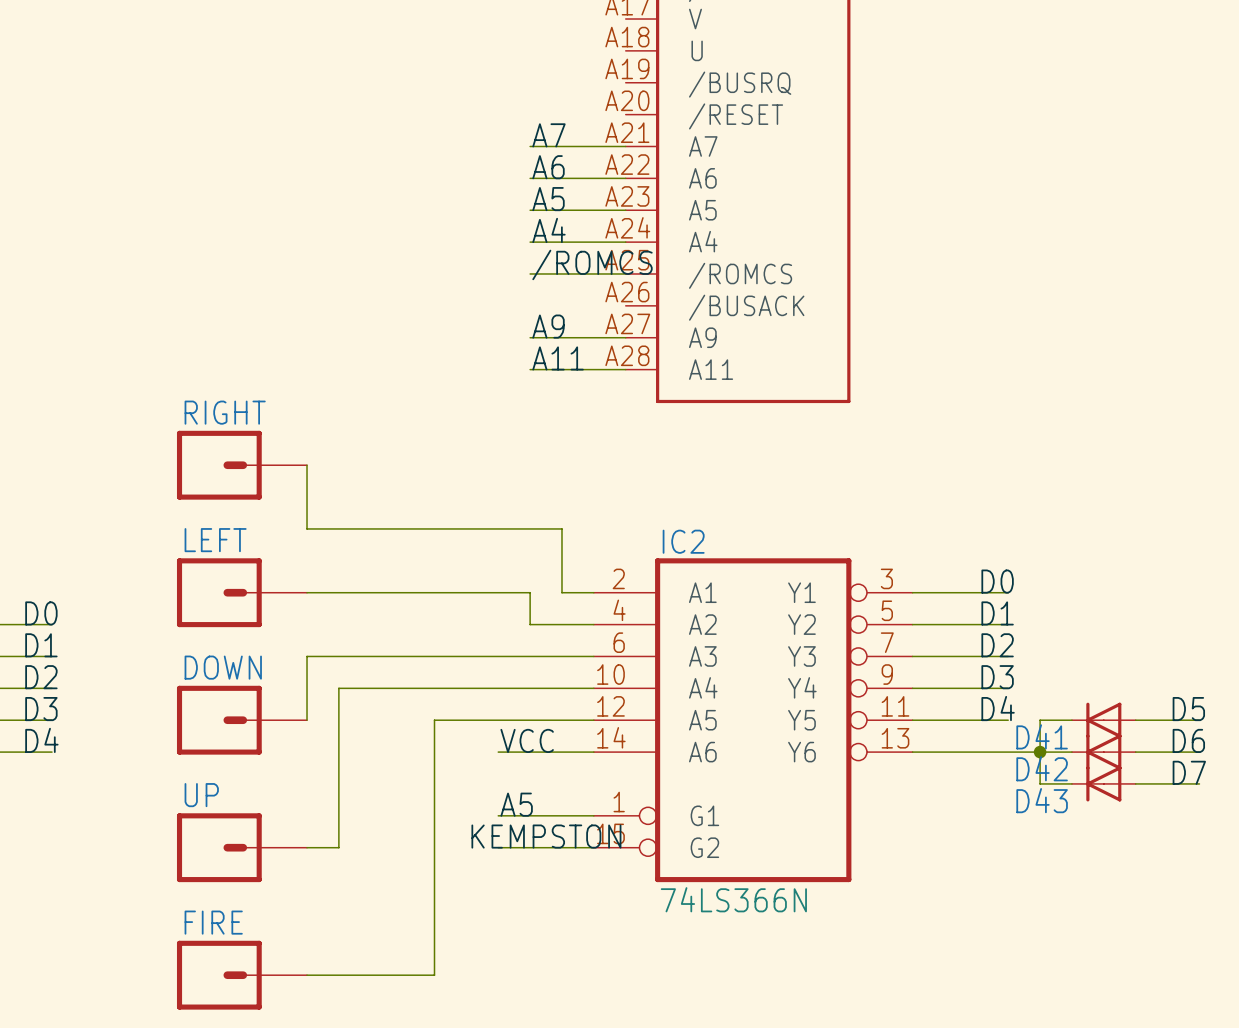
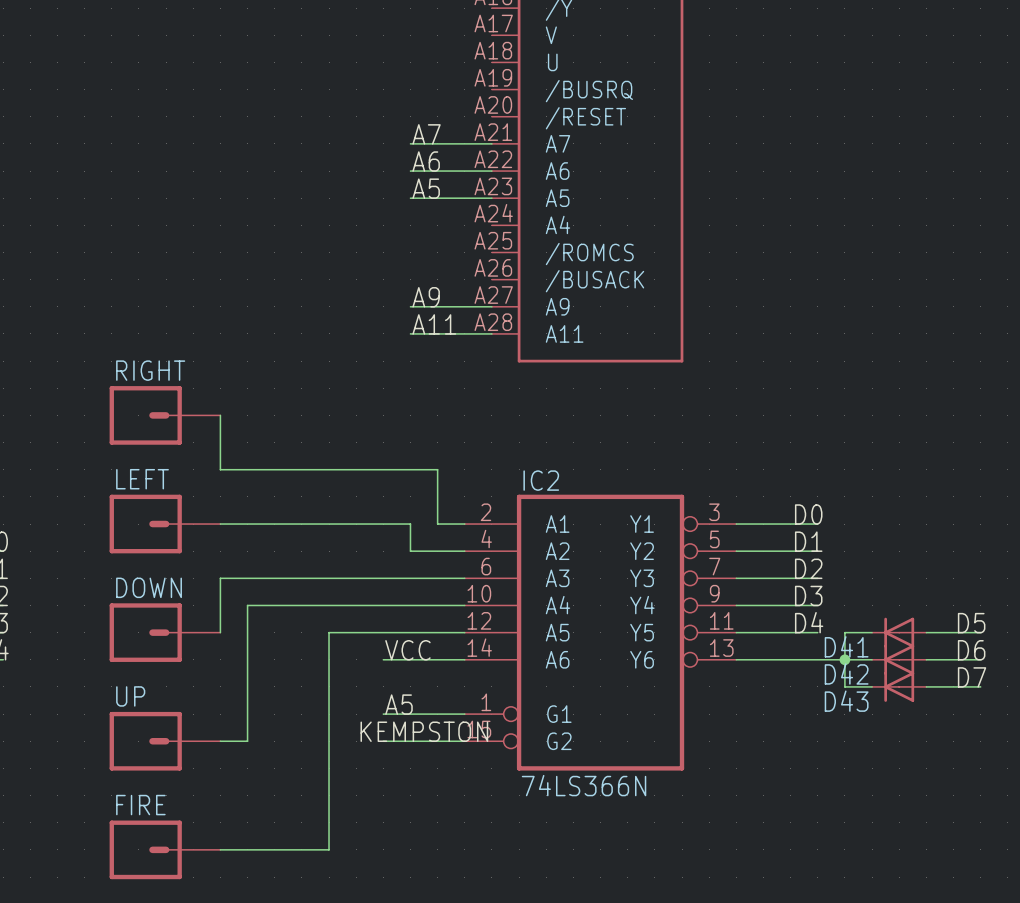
label: A4 (548, 230) -> none
wire: (530, 242) (625, 242) -> none
label: /ROMCS (592, 264) -> none
wire: (530, 273) (625, 273) -> none

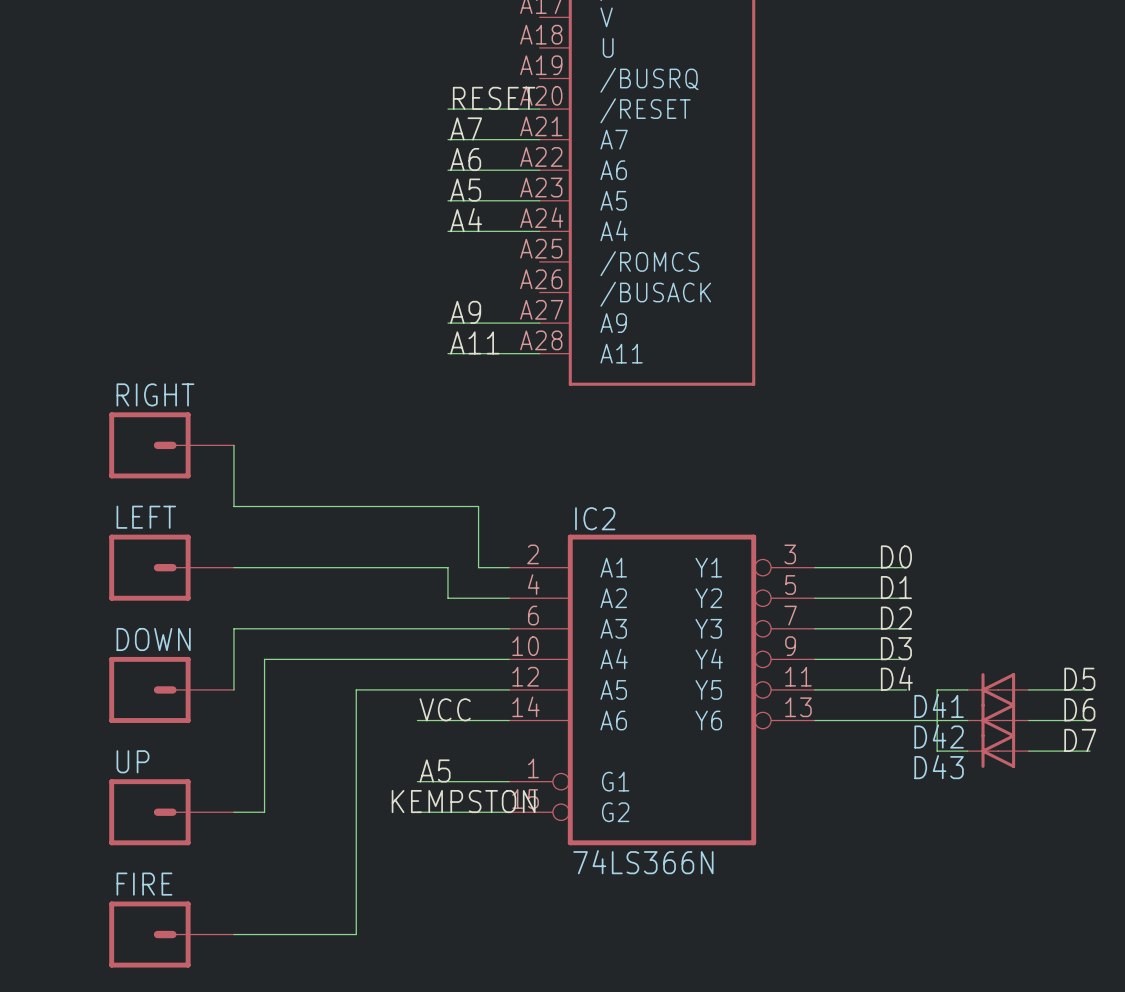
label: none -> RESET (494, 98)
wire: none -> (447, 109) (539, 109)
label: none -> A4 (466, 220)
wire: none -> (447, 231) (539, 231)
junction: (844, 659) -> none

